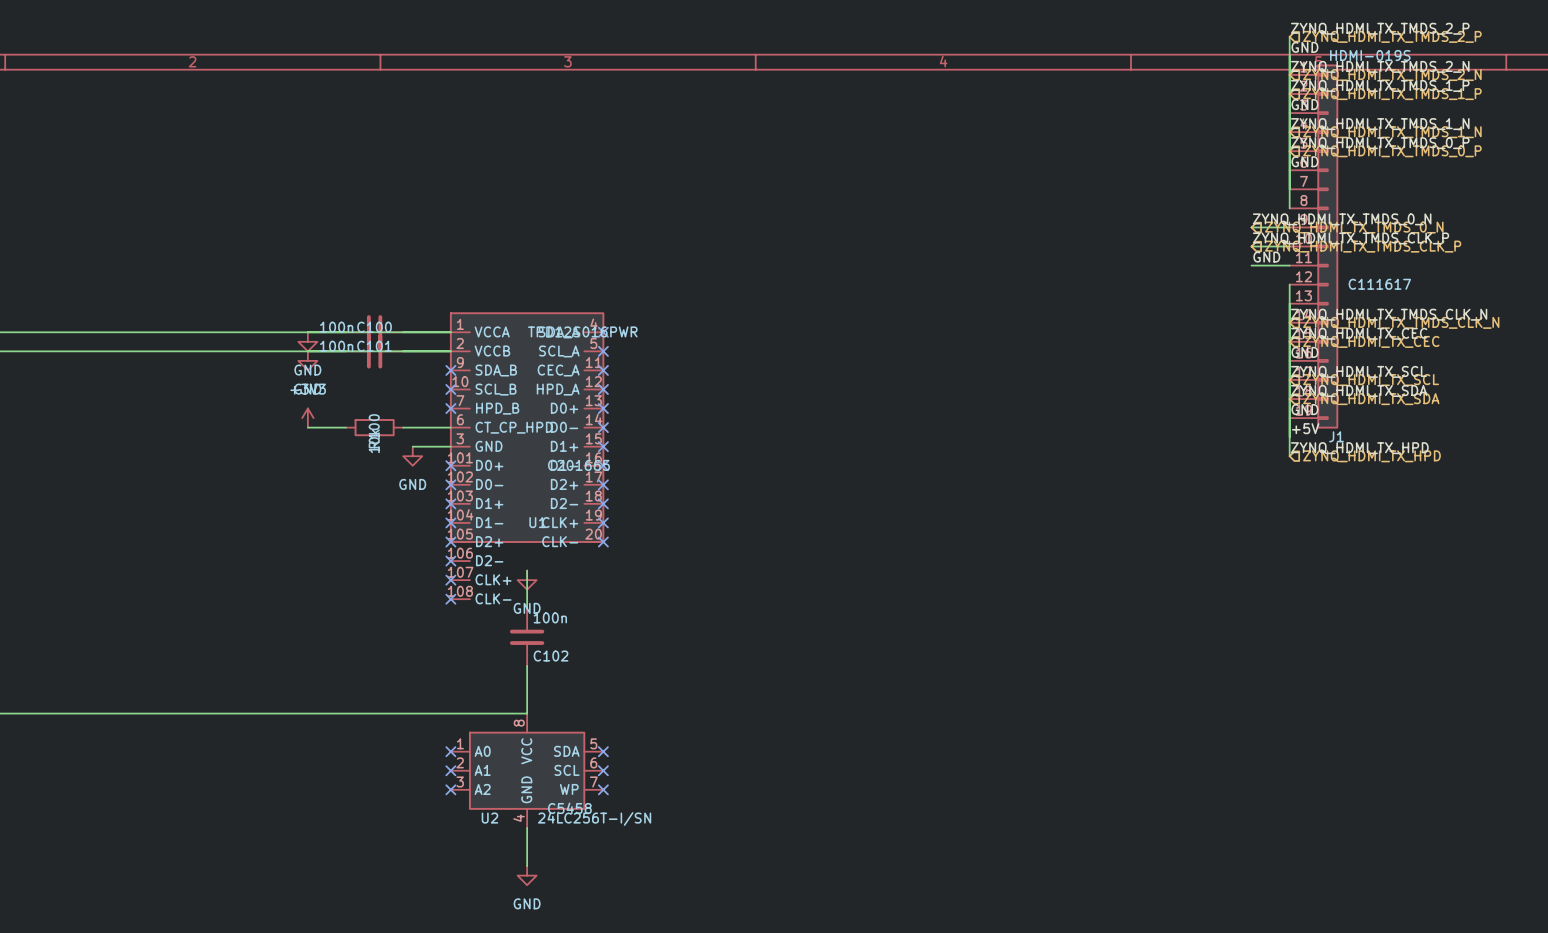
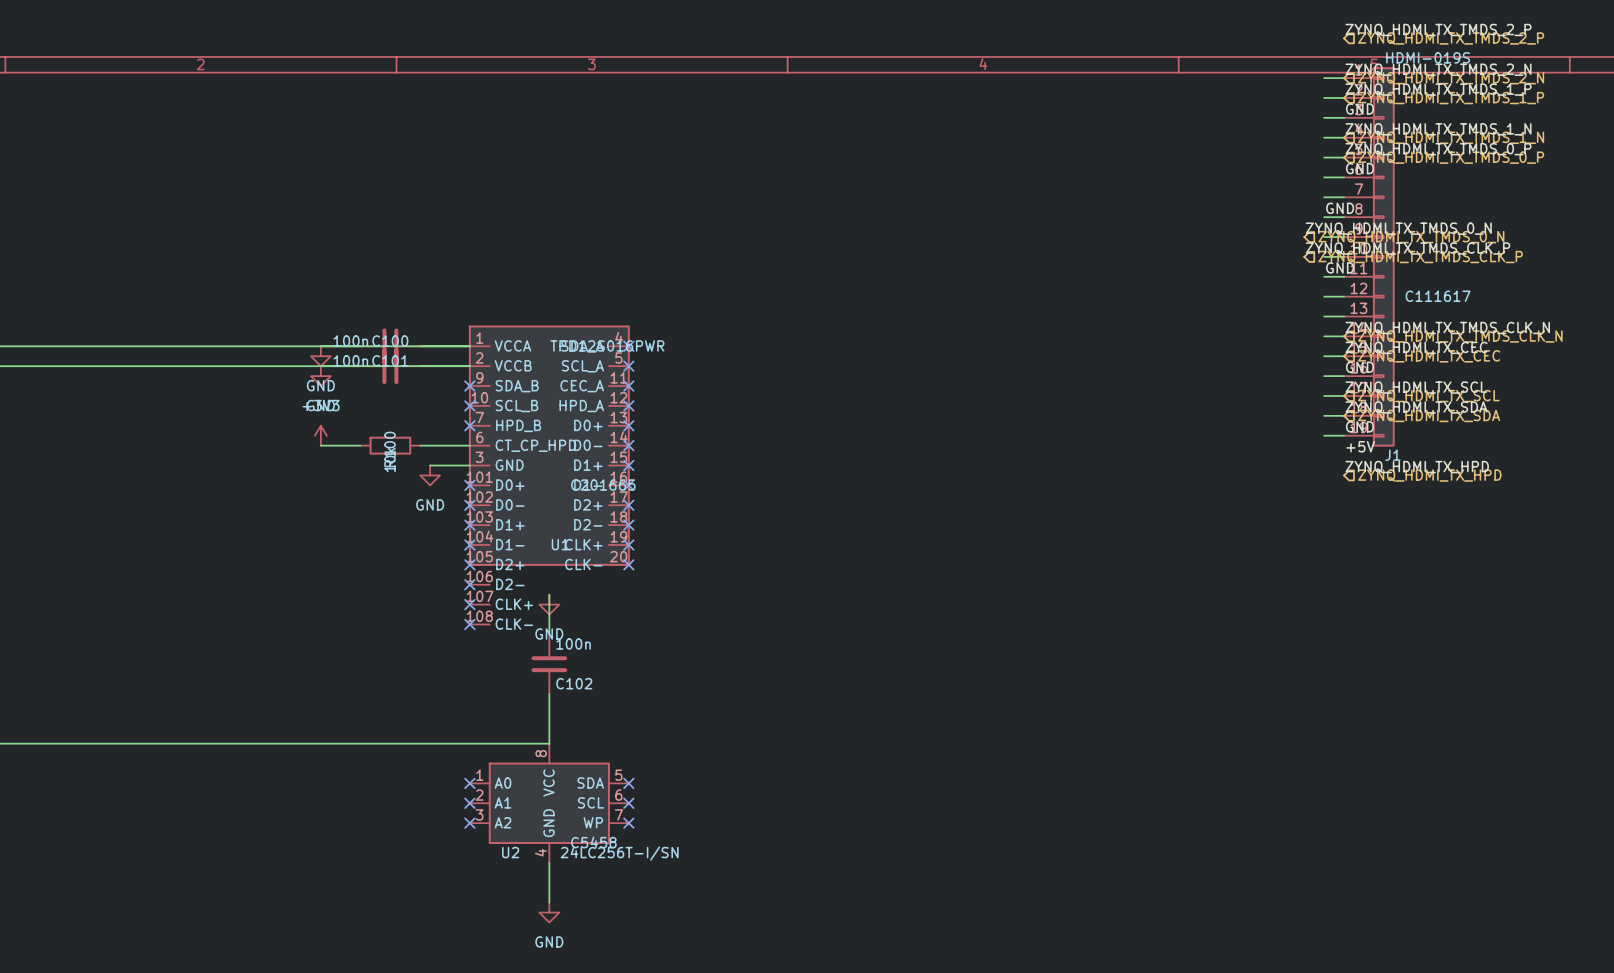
wire: (1289, 36) (1289, 208) -> (1324, 217) (1344, 217)
label: GND (1304, 47) -> none
wire: none -> (1324, 78) (1344, 78)
wire: none -> (1324, 97) (1344, 97)
wire: none -> (1324, 117) (1344, 117)
wire: none -> (1324, 137) (1344, 137)
wire: none -> (1324, 157) (1344, 157)
wire: none -> (1324, 197) (1344, 197)
label: none -> GND (1340, 208)
wire: (1251, 227) (1270, 227) -> (1324, 177) (1344, 177)
wire: (1251, 246) (1270, 246) -> (1324, 316) (1344, 316)
label position: GND (1266, 257) -> GND (1340, 267)
wire: (1251, 265) (1270, 265) -> (1324, 336) (1344, 336)
wire: (1289, 284) (1289, 456) -> (1344, 296) (1324, 296)
wire: none -> (1324, 356) (1344, 356)
wire: none -> (1324, 376) (1344, 376)
wire: none -> (1324, 395) (1344, 395)
wire: none -> (1324, 415) (1344, 415)
wire: none -> (1324, 435) (1344, 435)

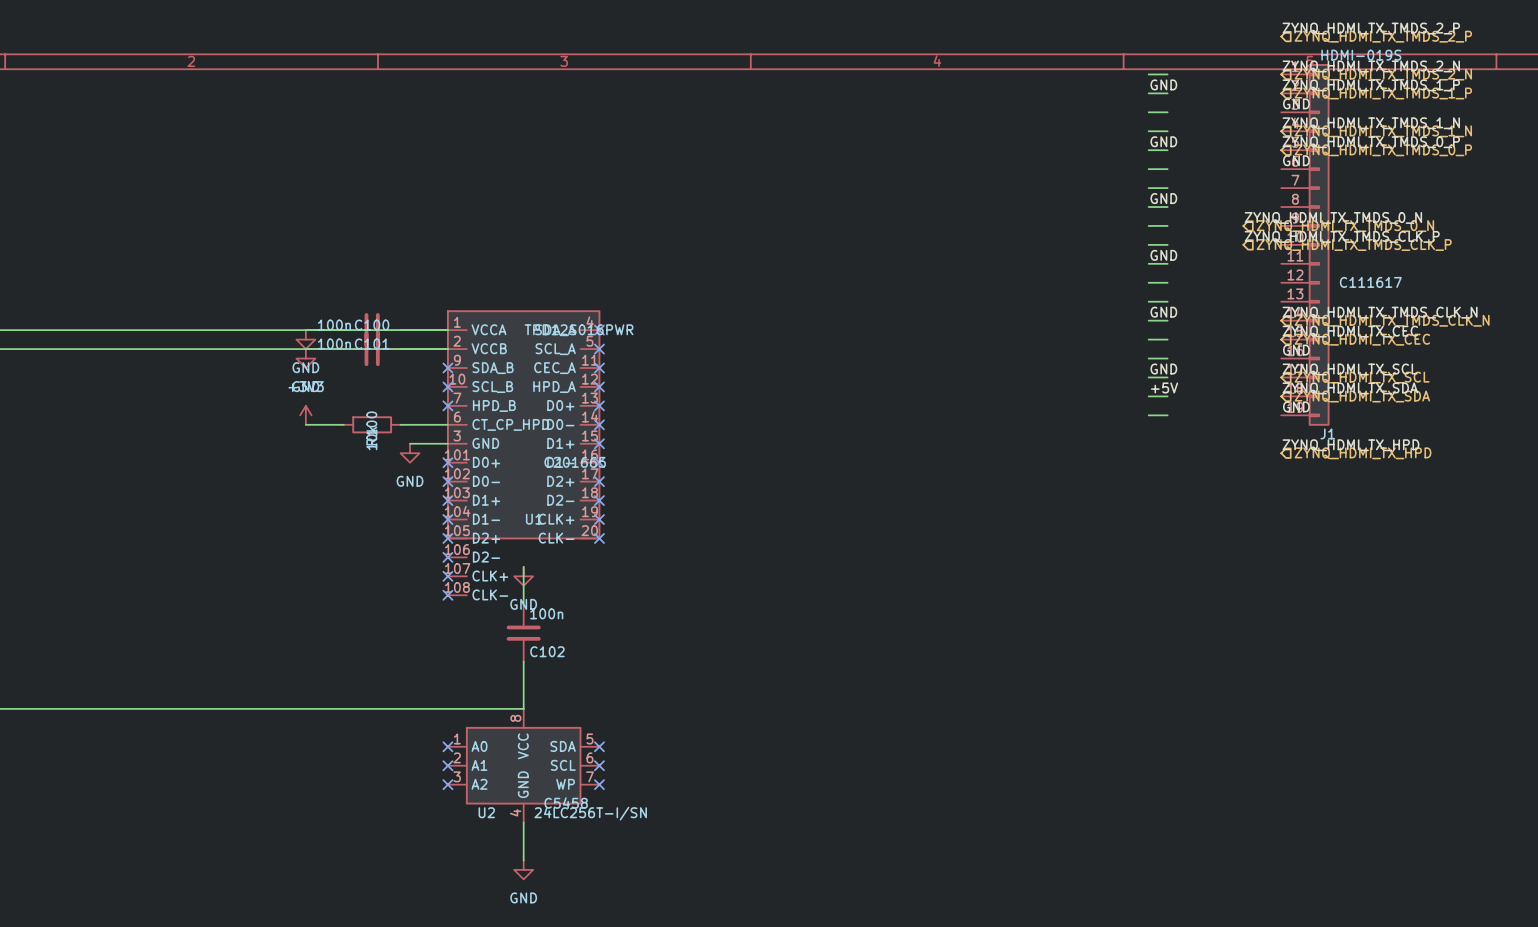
wire: (1324, 78) (1344, 78) -> (1148, 74) (1167, 74)
label: none -> GND (1163, 84)
wire: (1324, 97) (1344, 97) -> (1148, 93) (1167, 93)
wire: (1324, 117) (1344, 117) -> (1148, 112) (1167, 112)
wire: (1324, 137) (1344, 137) -> (1148, 131) (1167, 131)
label: none -> GND (1163, 141)
wire: (1324, 157) (1344, 157) -> (1148, 150) (1167, 150)
wire: (1324, 177) (1344, 177) -> (1148, 169) (1167, 169)
wire: (1324, 197) (1344, 197) -> (1148, 188) (1167, 188)
label: none -> GND (1163, 198)
label: GND (1340, 208) -> none
wire: (1324, 217) (1344, 217) -> (1148, 207) (1167, 207)
wire: (1324, 237) (1344, 237) -> (1148, 225) (1167, 225)
wire: (1324, 256) (1344, 256) -> (1148, 244) (1167, 244)
label: none -> GND (1163, 255)
label: GND (1340, 267) -> none
wire: (1324, 276) (1344, 276) -> (1148, 263) (1167, 263)
wire: (1324, 296) (1344, 296) -> (1148, 282) (1167, 282)
wire: (1324, 316) (1344, 316) -> (1148, 301) (1167, 301)
label: none -> GND (1163, 312)
wire: (1324, 336) (1344, 336) -> (1148, 320) (1167, 320)
wire: (1324, 356) (1344, 356) -> (1148, 339) (1167, 339)
wire: (1324, 376) (1344, 376) -> (1148, 358) (1167, 358)
label: none -> GND (1163, 369)
wire: (1324, 395) (1344, 395) -> (1148, 377) (1167, 377)
wire: (1324, 415) (1344, 415) -> (1148, 396) (1167, 396)
wire: (1324, 435) (1344, 435) -> (1148, 415) (1167, 415)
label position: +5V (1360, 446) -> +5V (1164, 387)

